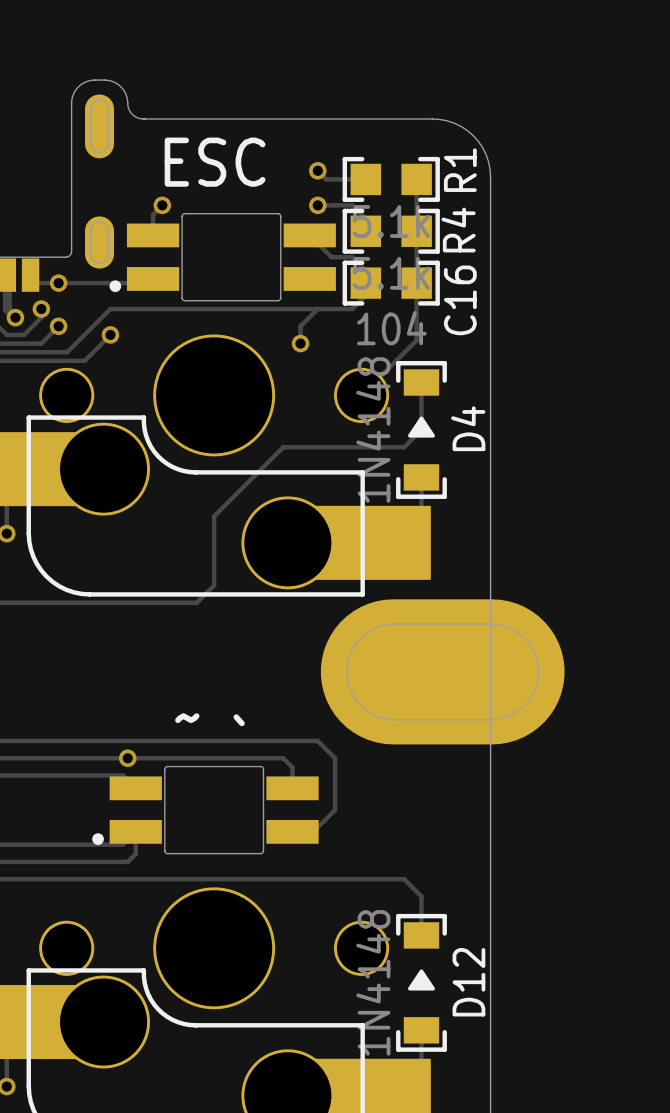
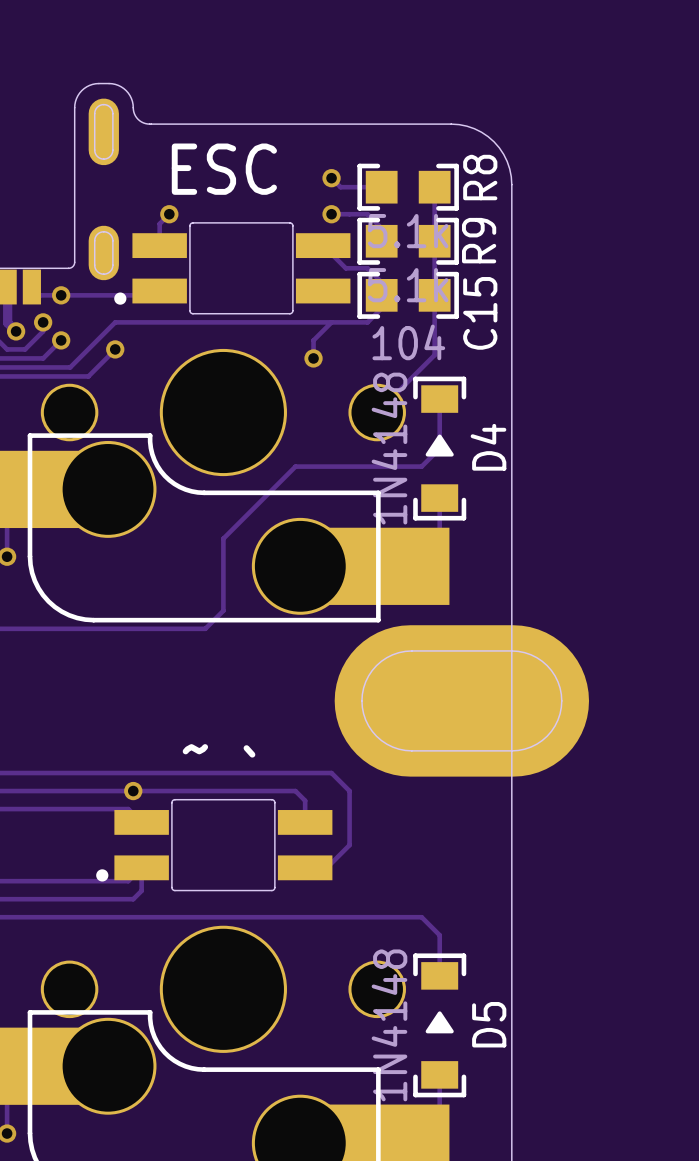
R1 name: R1 (460, 170) -> R8 (480, 177)
R4 name: R4 (458, 230) -> R9 (479, 240)
C16 name: C16 (460, 300) -> C15 (480, 313)
D12 name: D12 (468, 982) -> D5 (489, 1024)

